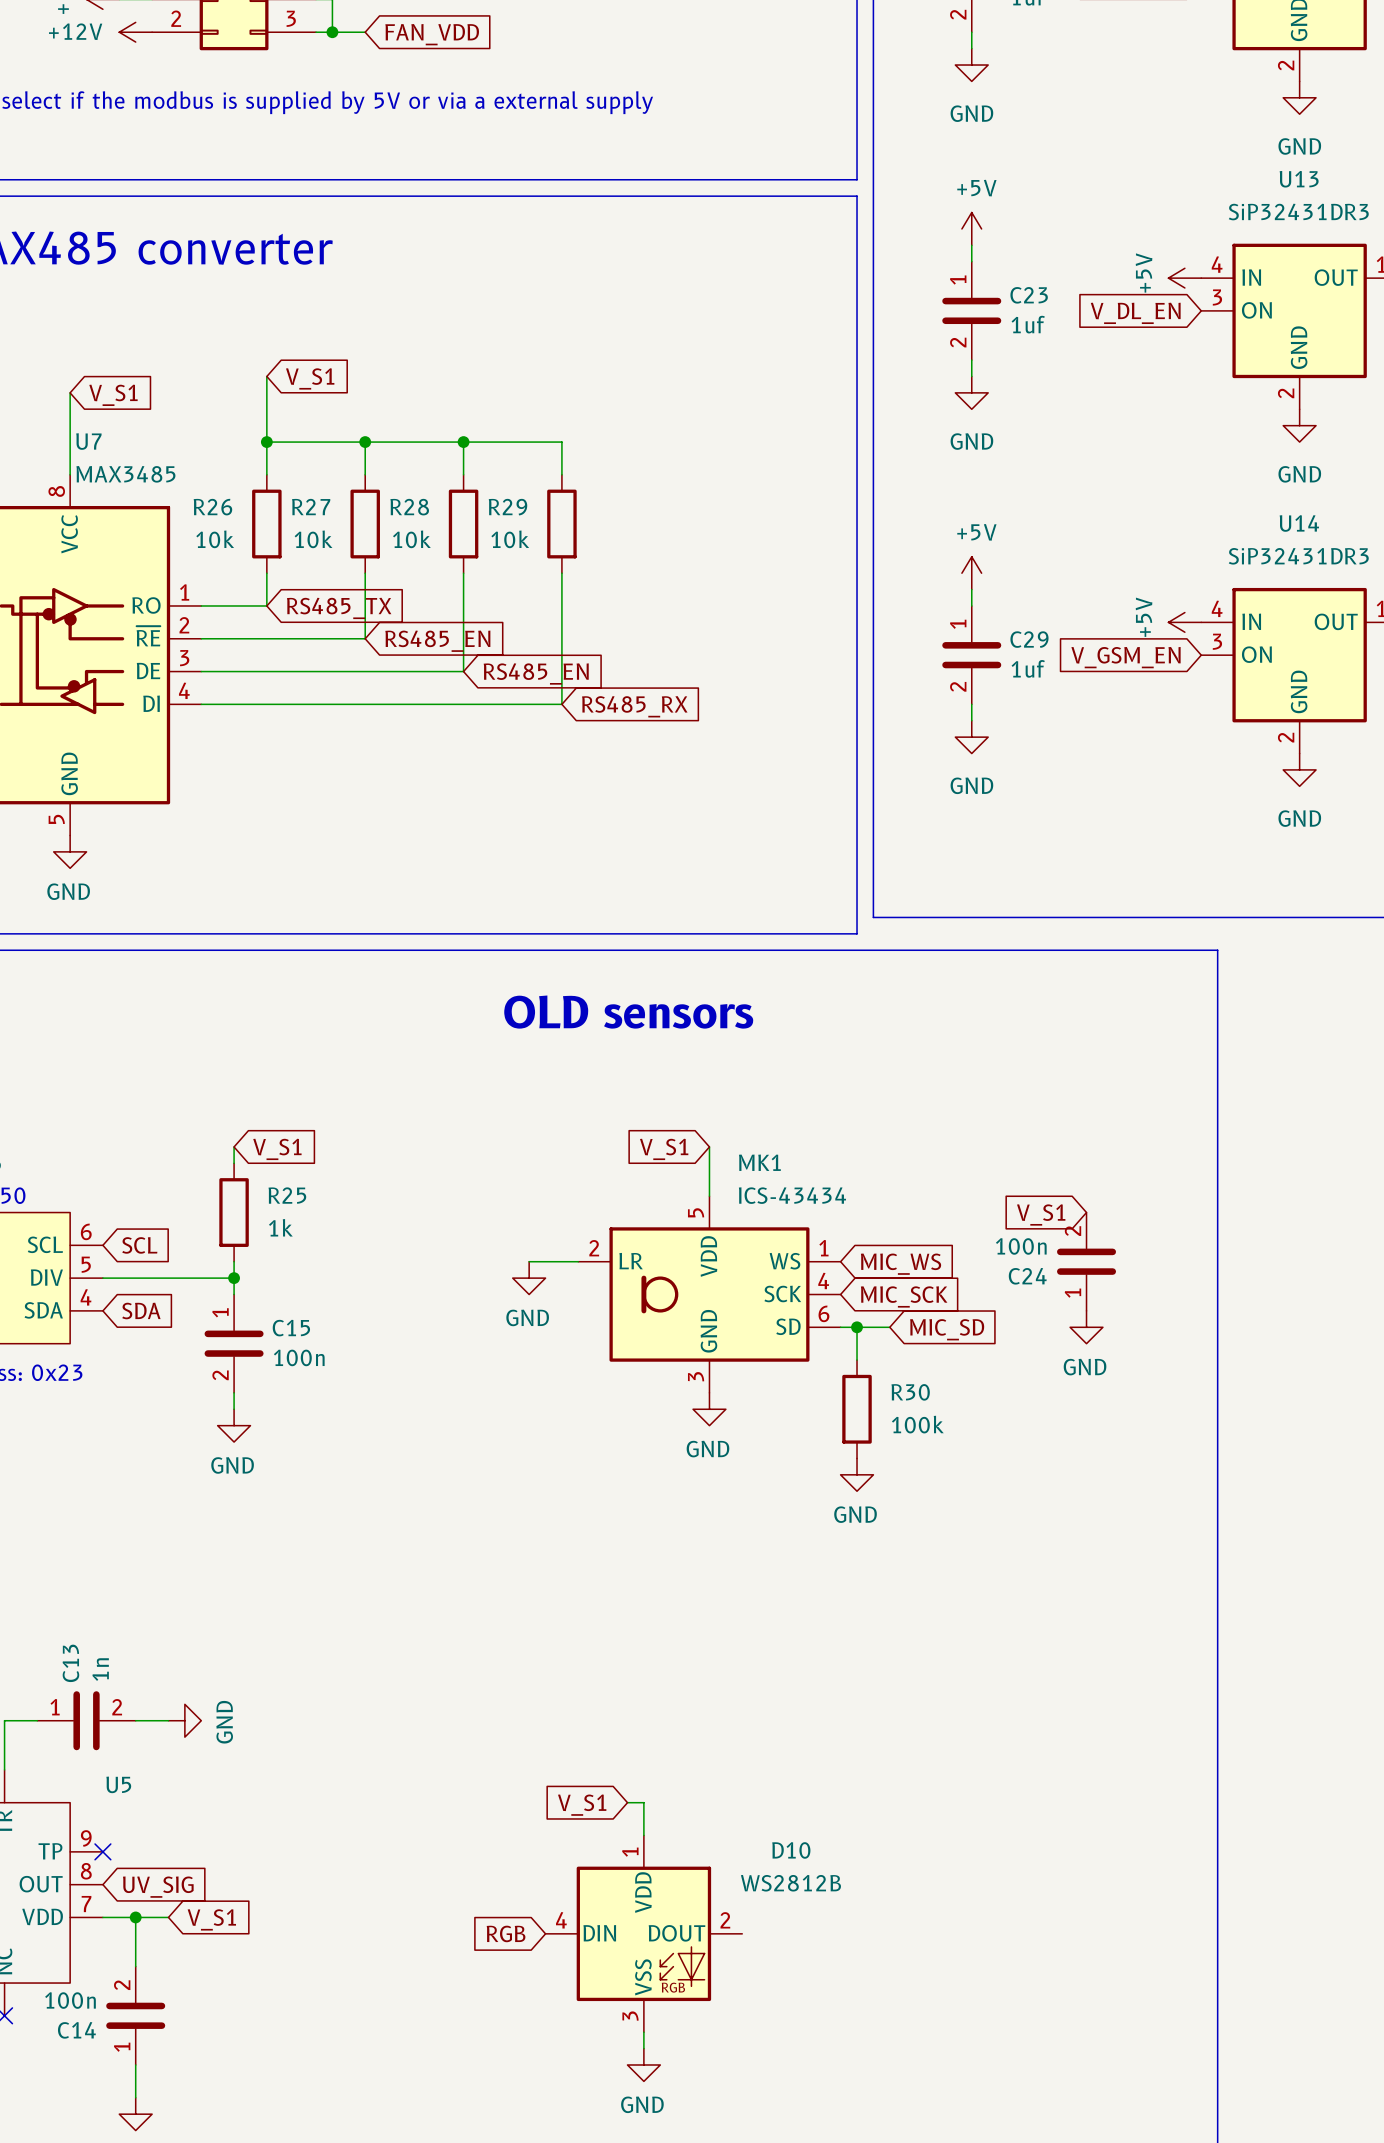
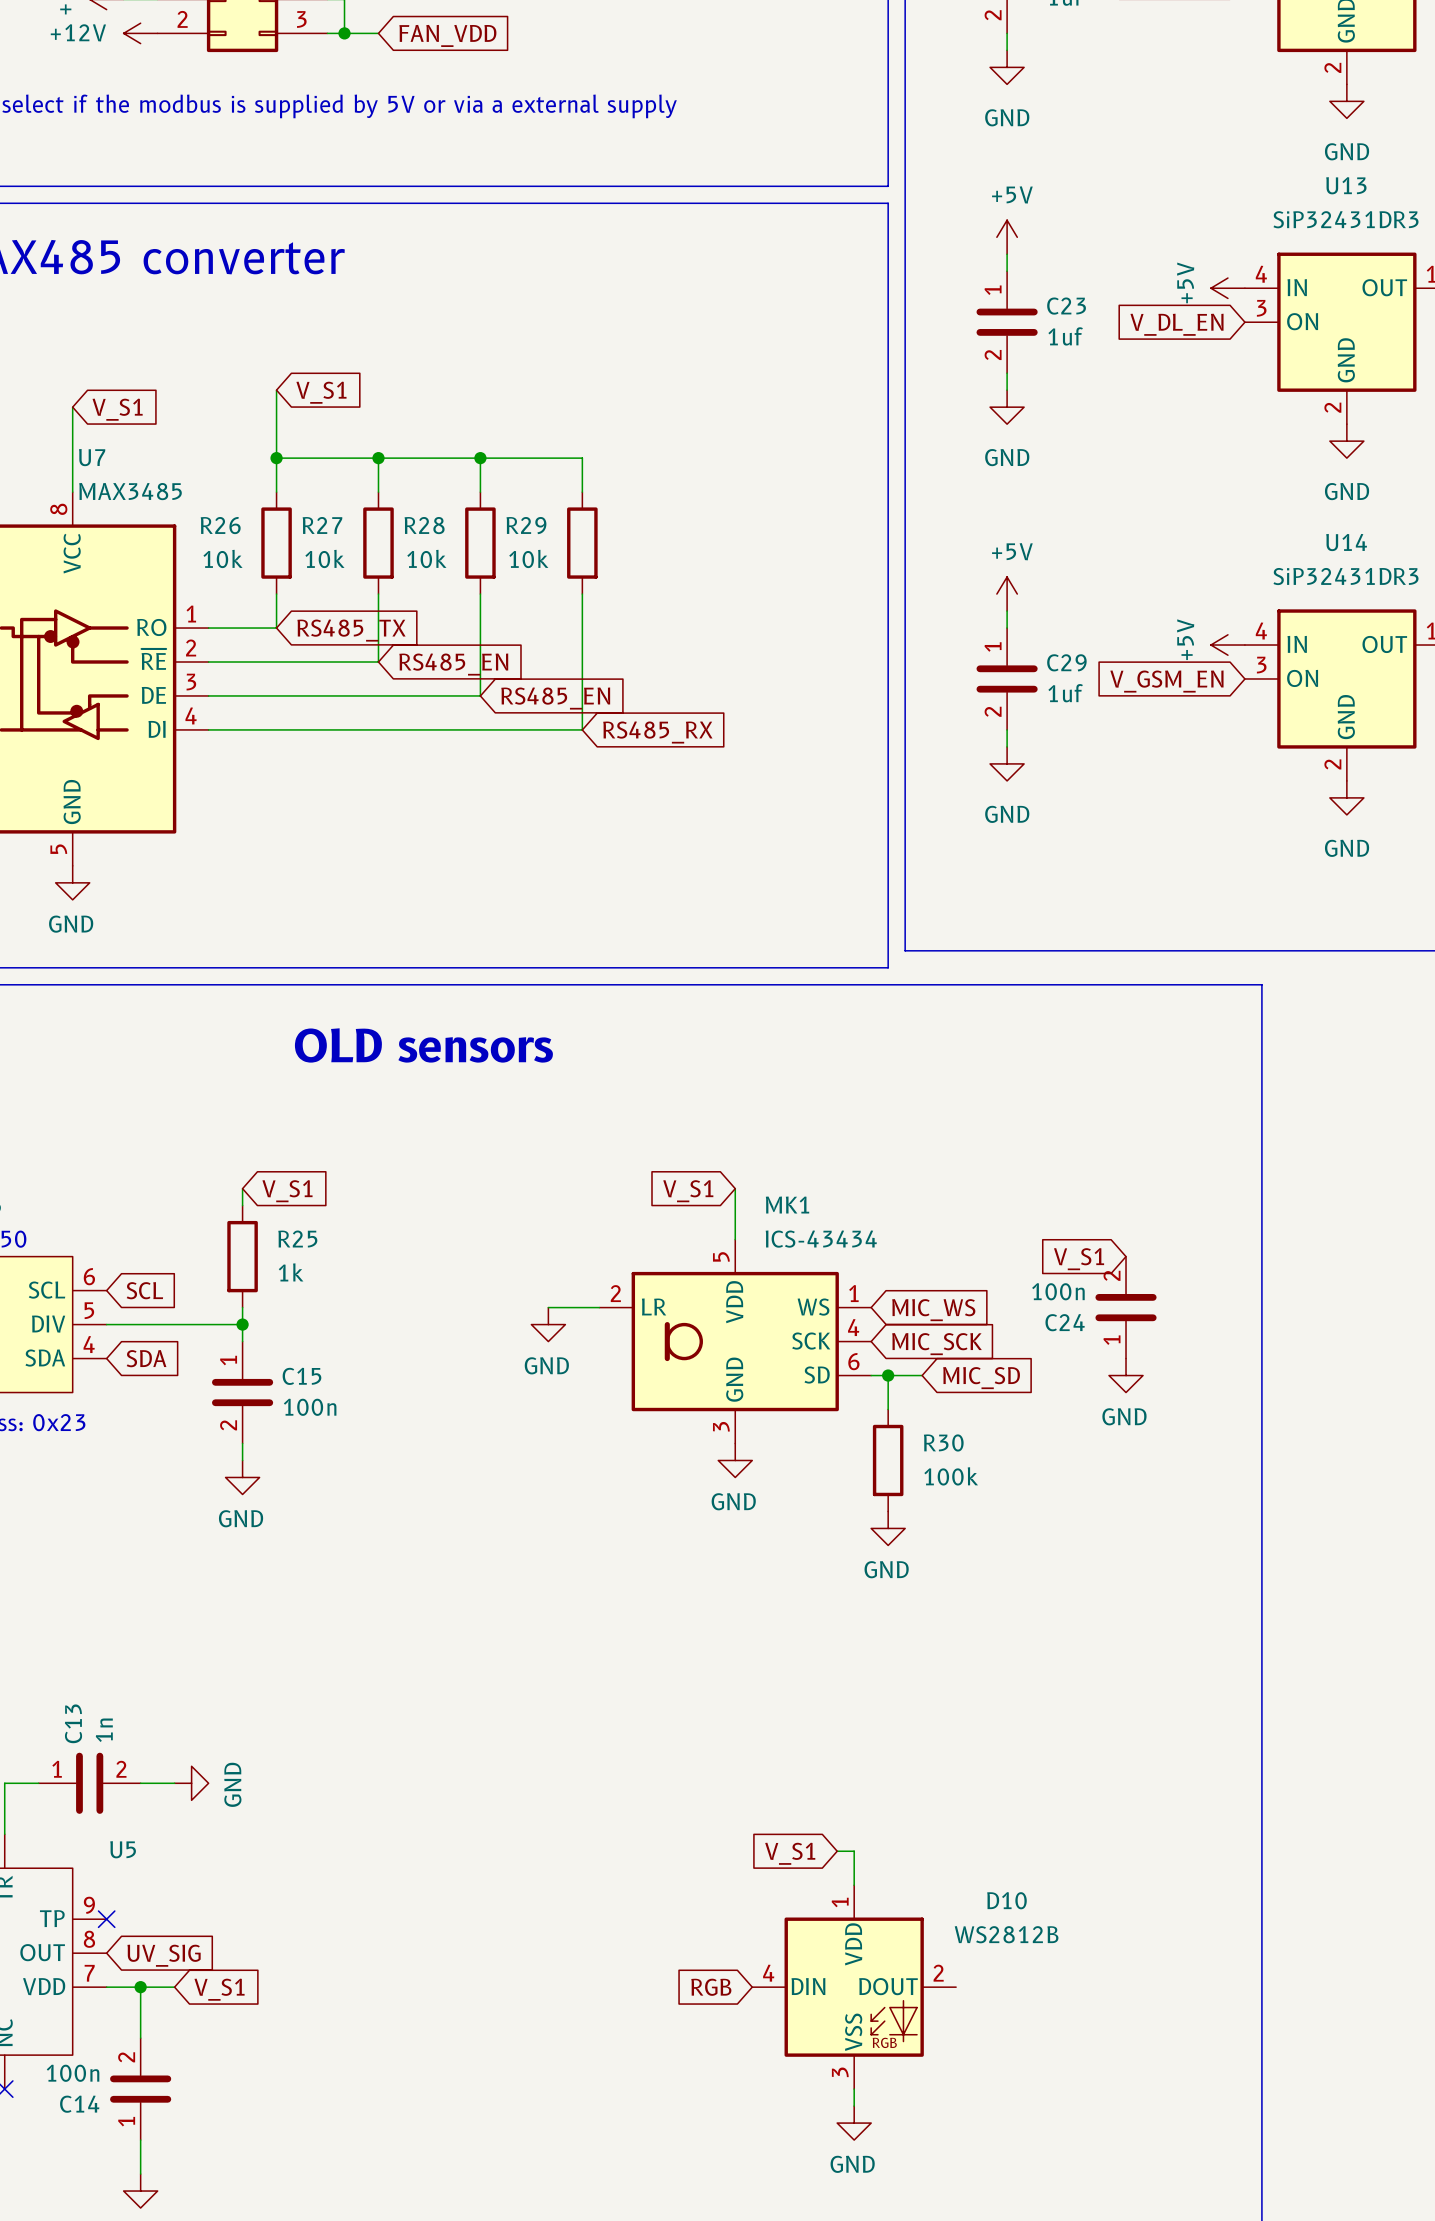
text position: OLD sensors (628, 1012) -> OLD sensors (423, 1045)
wire: (627, 1802) (643, 1802) (643, 1835) -> (837, 1851) (854, 1851) (854, 1885)
global label position: V_S1 (582, 1805) -> V_S1 (790, 1853)
global label position: RGB (506, 1933) -> RGB (711, 1987)
D10 position: (643, 1933) -> (854, 1987)
wire: (643, 2032) (643, 2048) -> (854, 2089) (854, 2106)
power symbol position: GND (643, 2064) -> GND (854, 2123)

